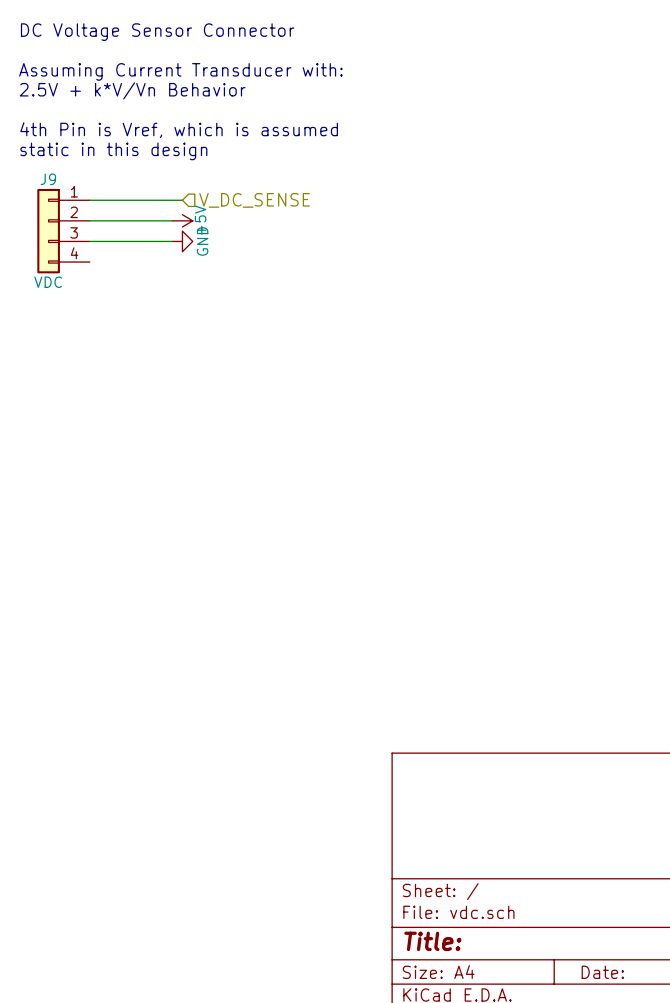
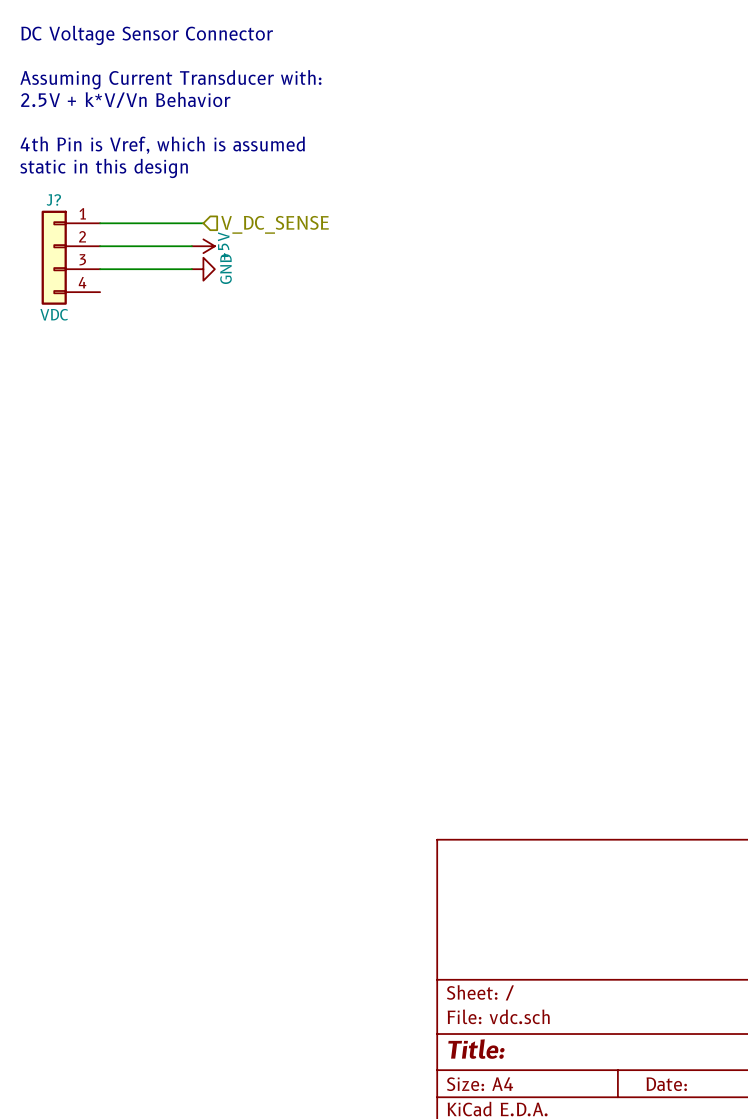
J9 name: J9 (48, 179) -> J? (53, 199)

